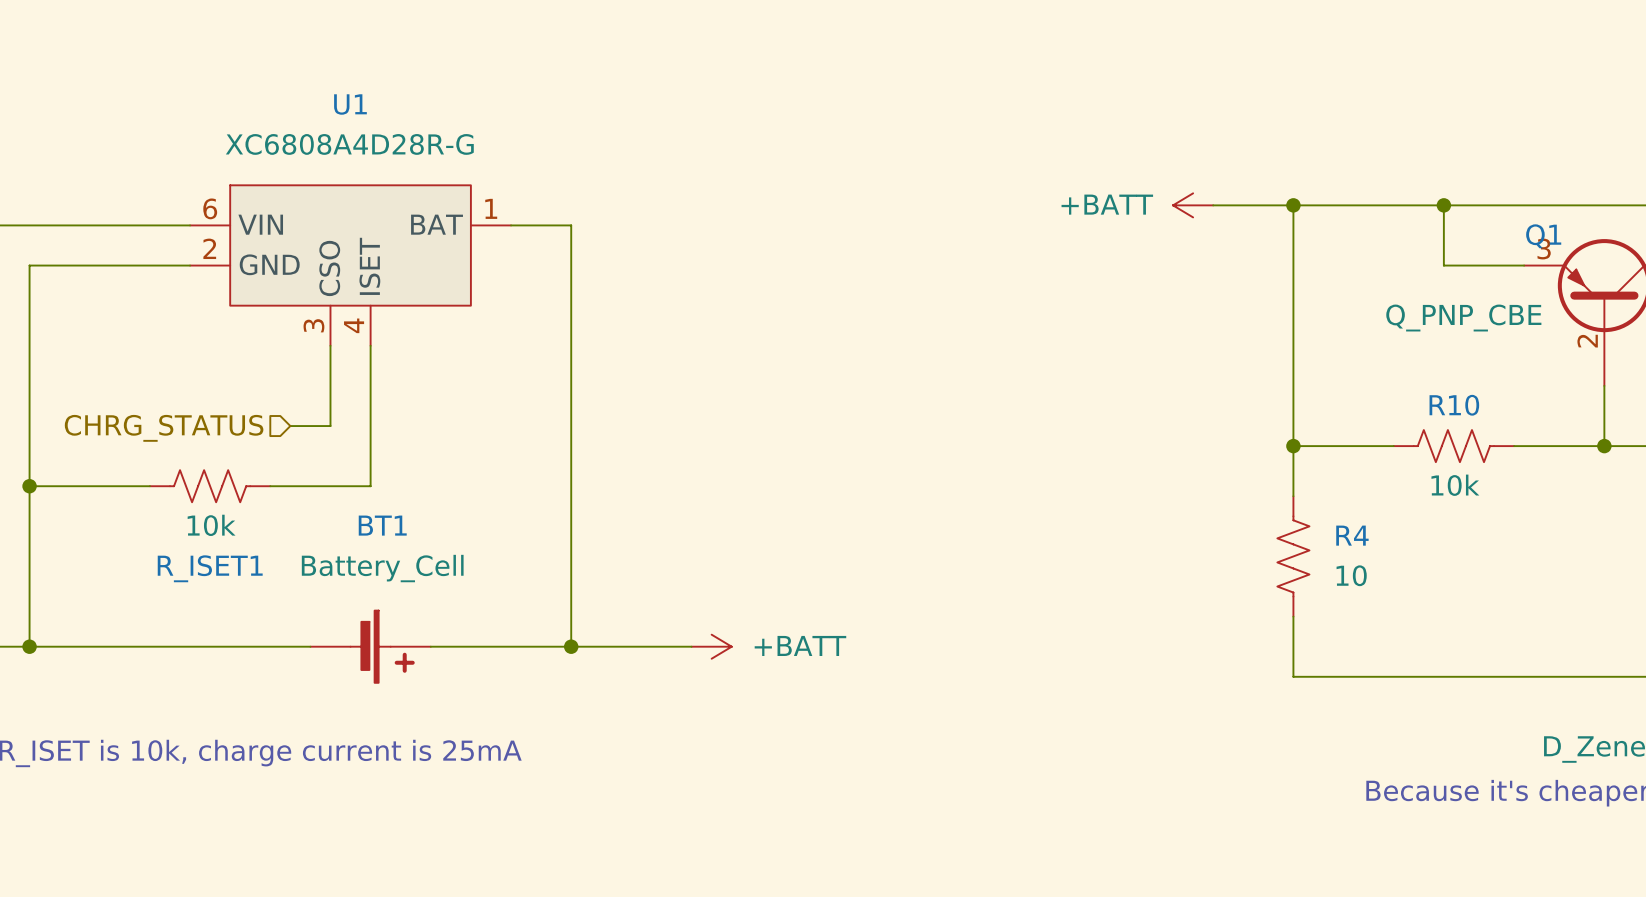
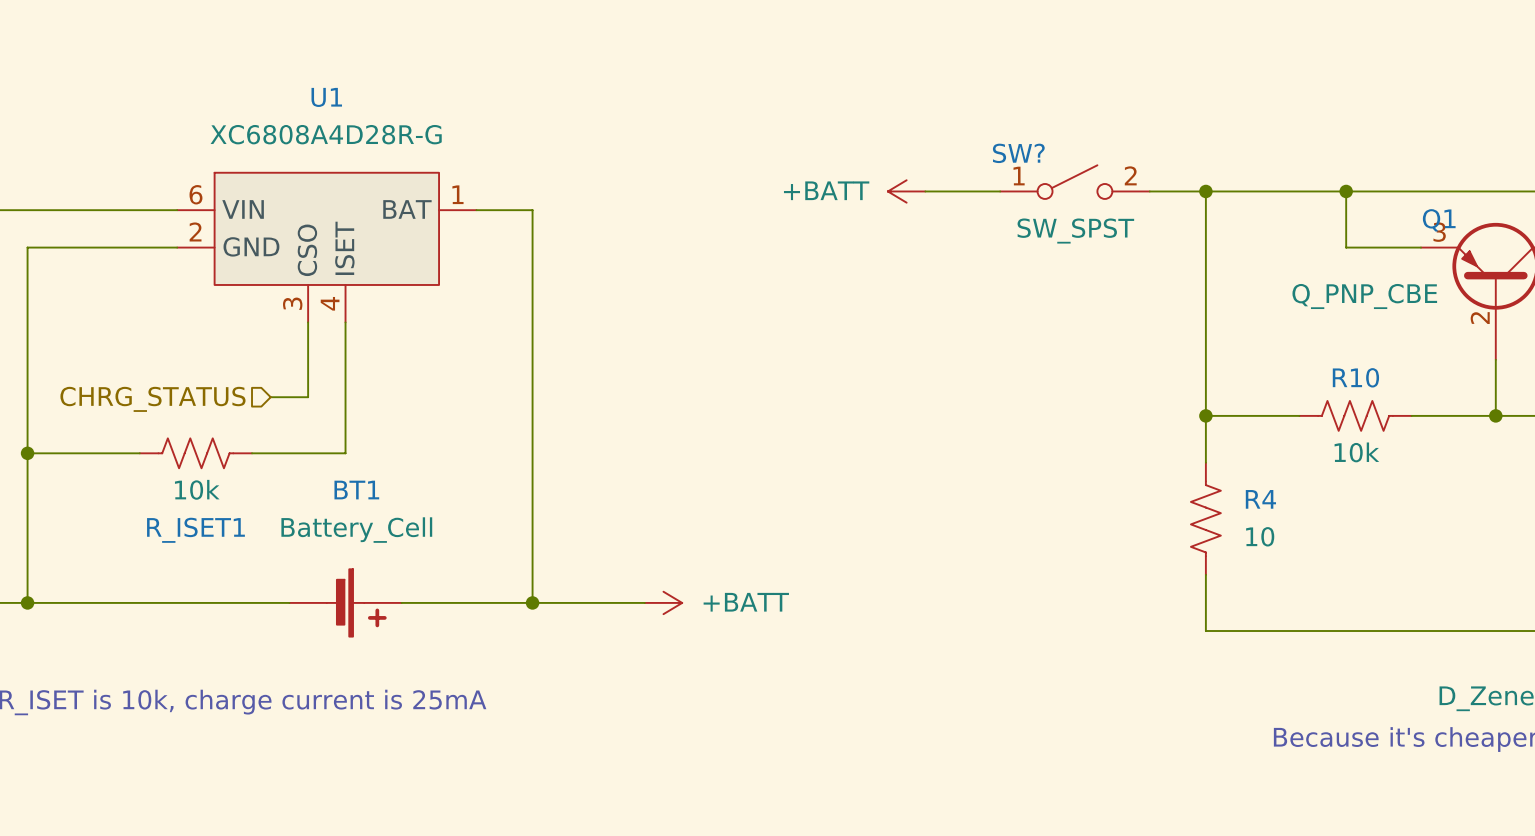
SW?: none -> SW_SPST (1074, 182)
wire: none -> (925, 191) (1000, 191)
power symbol position: +BATT (1193, 205) -> +BATT (906, 191)

